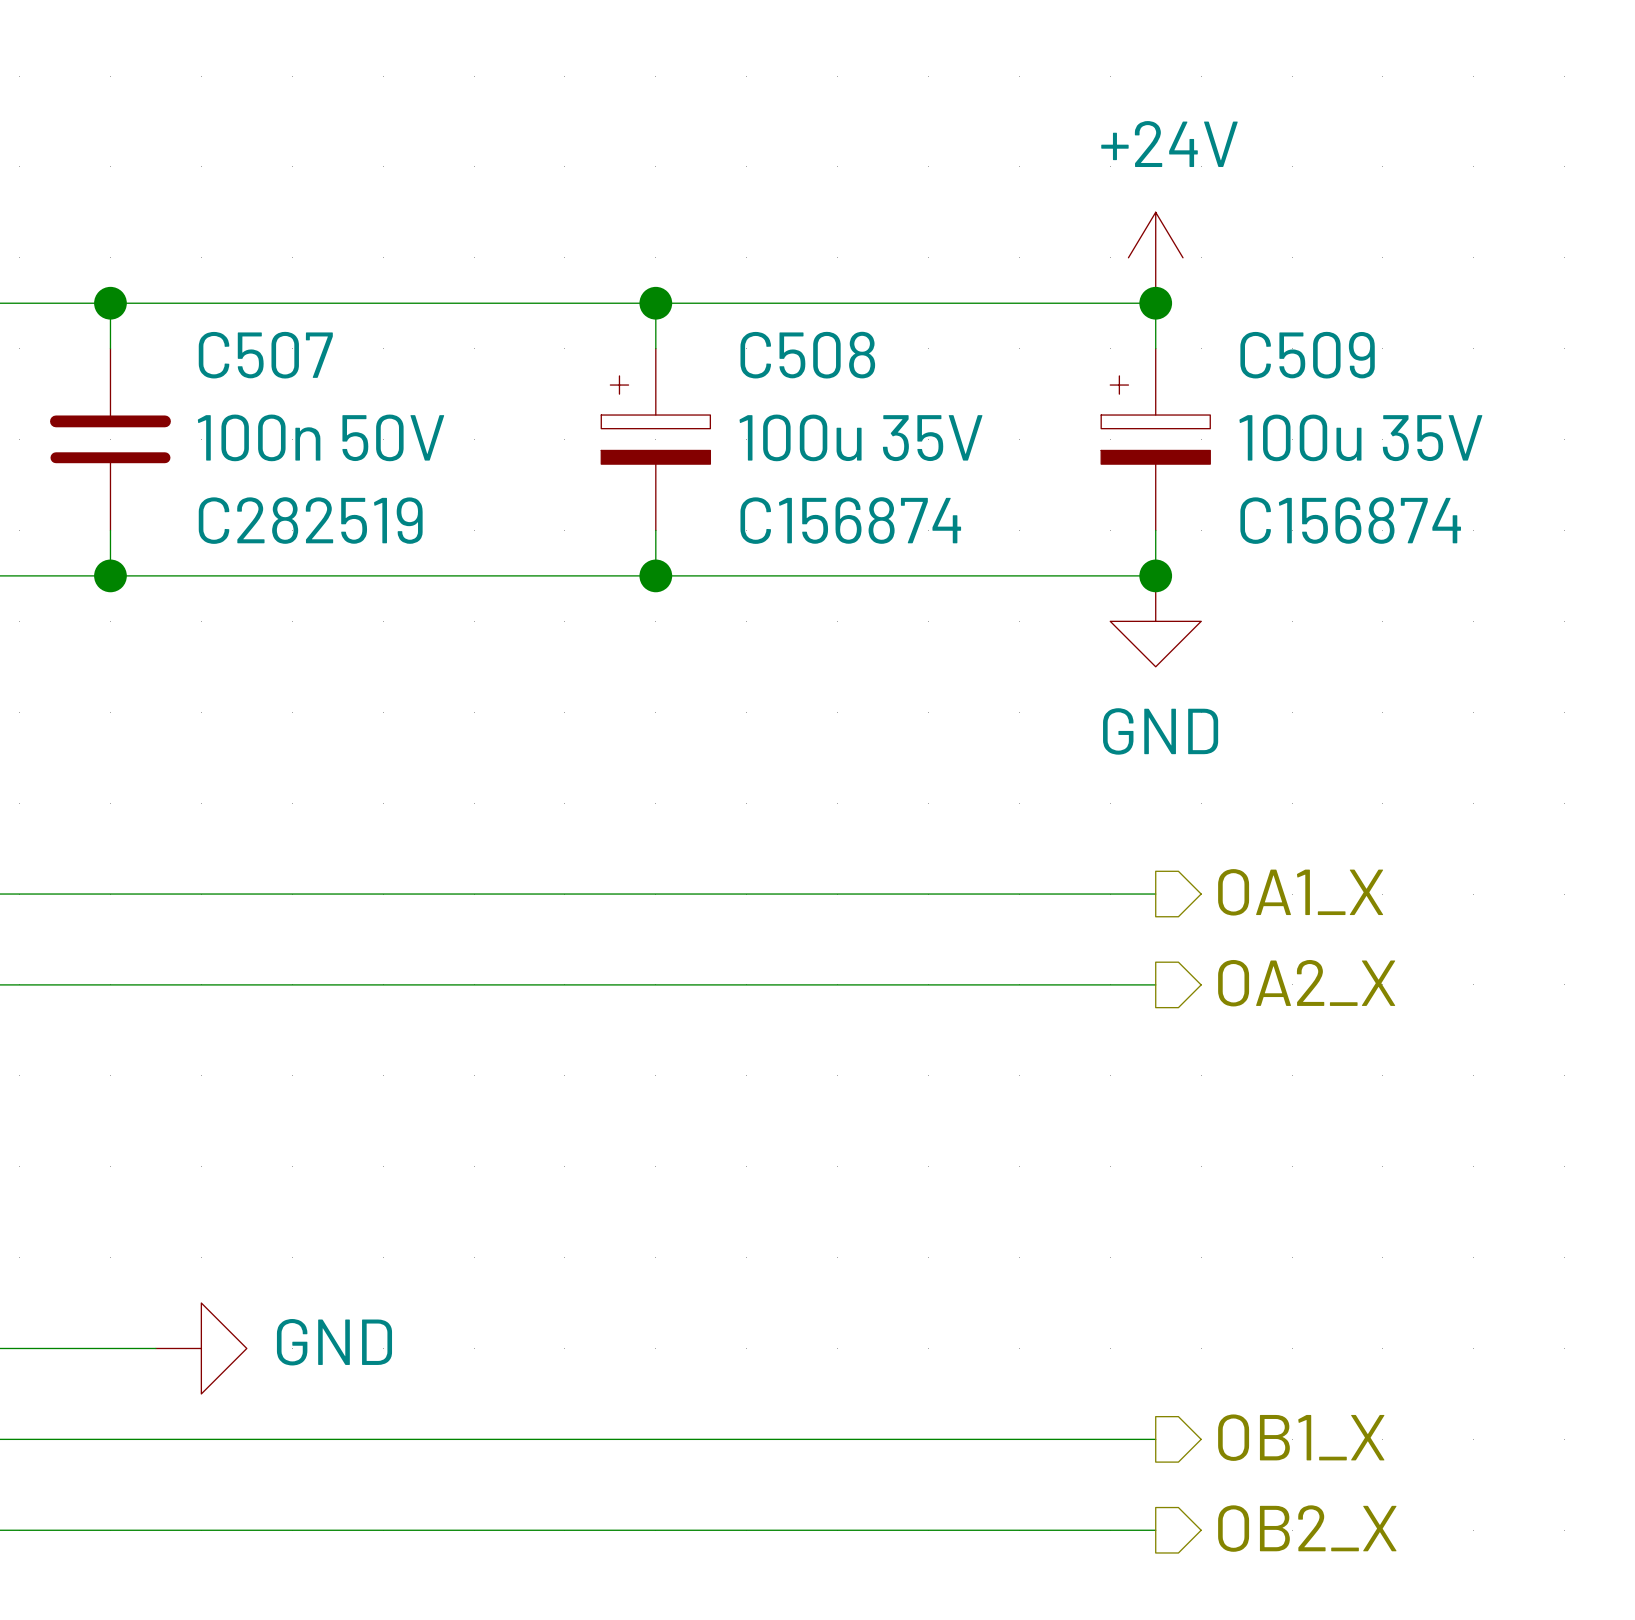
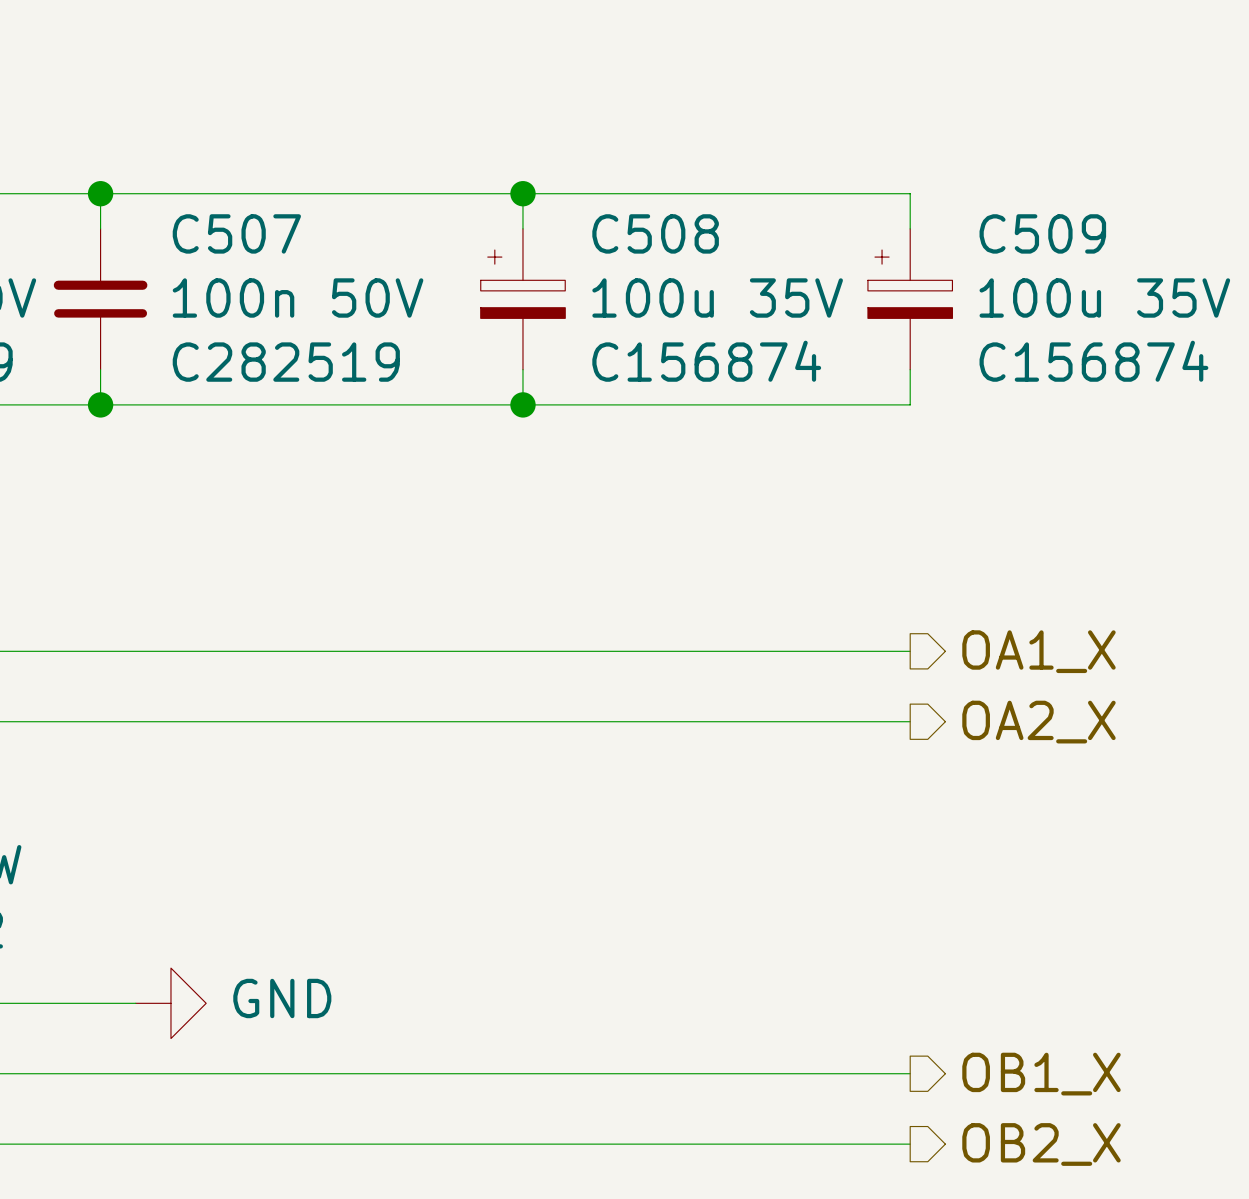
power symbol: +24V (1155, 257) -> none
junction: (1155, 303) -> none
junction: (1155, 575) -> none
power symbol: GND (1155, 621) -> none

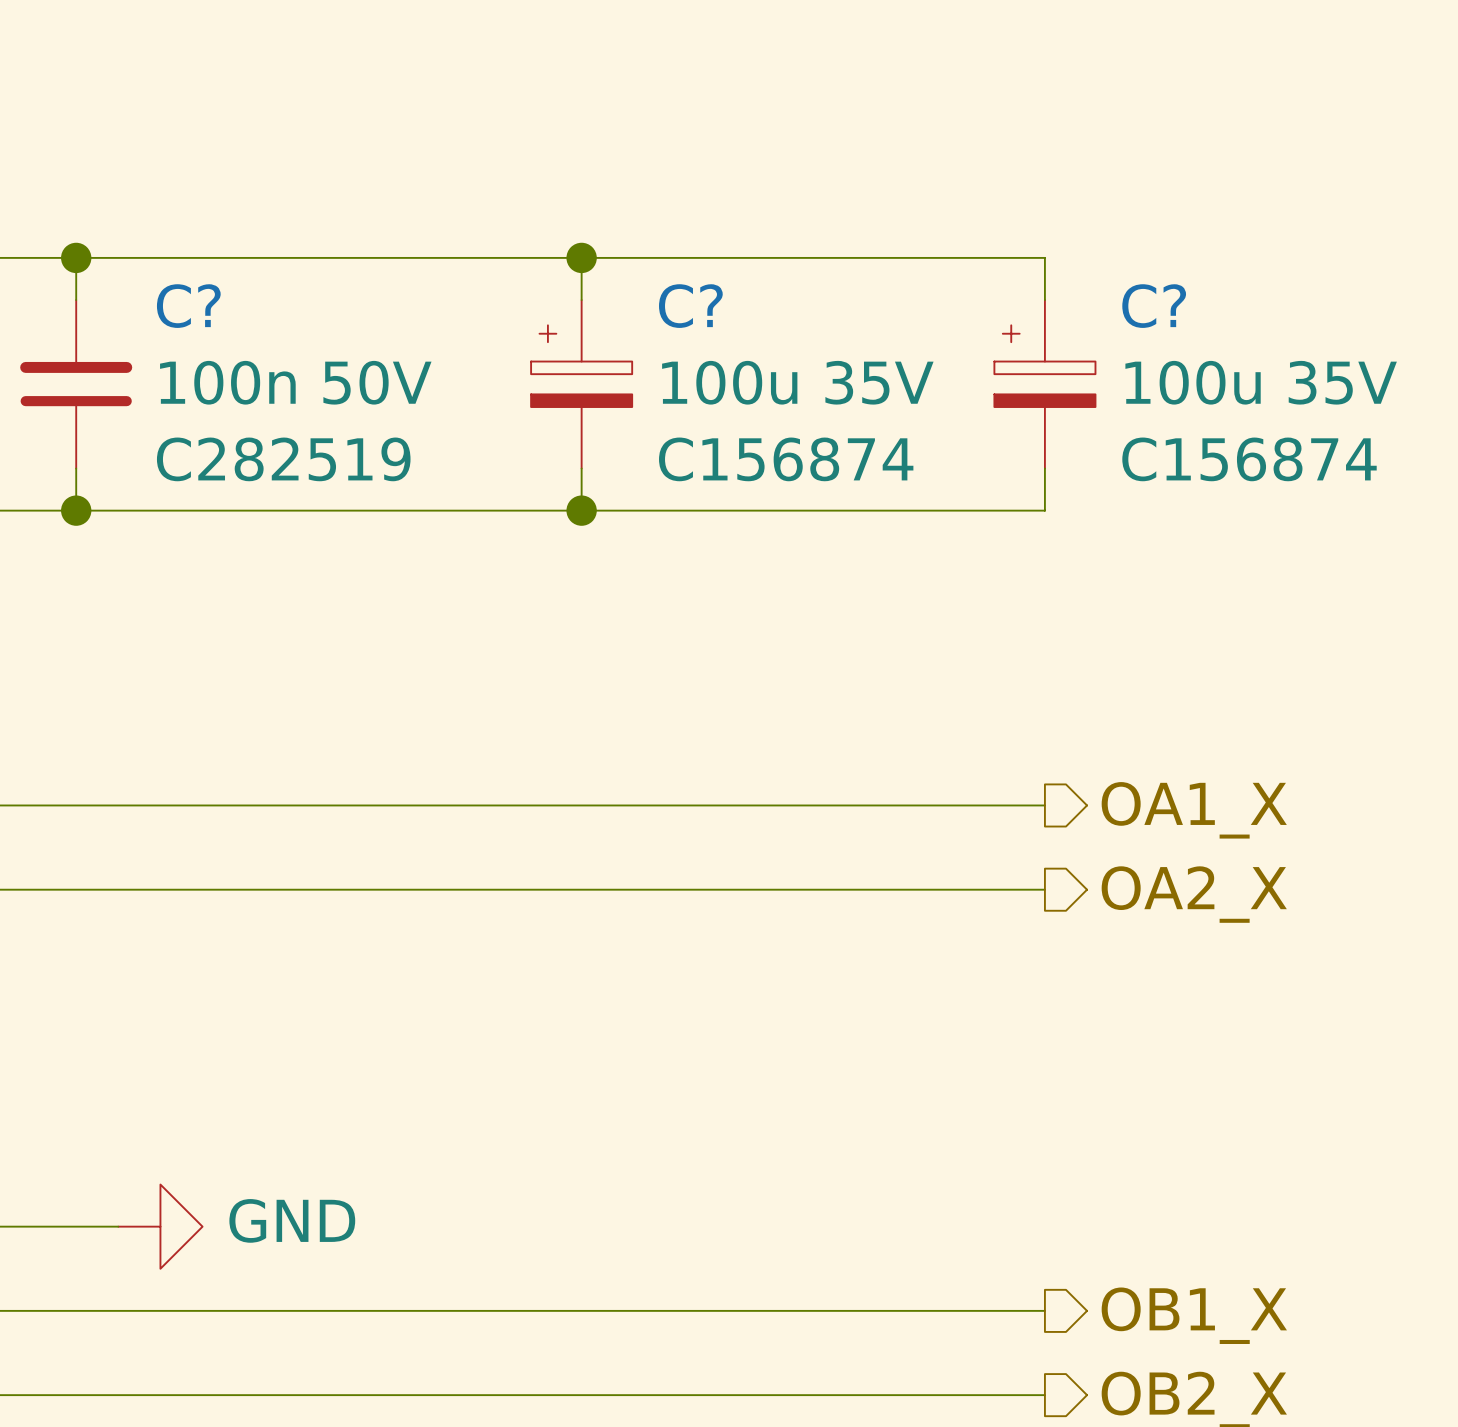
C507 name: C507 (236, 233) -> C? (188, 306)
C508 name: C508 (655, 233) -> C? (690, 306)
C509 name: C509 (1042, 233) -> C? (1154, 306)

